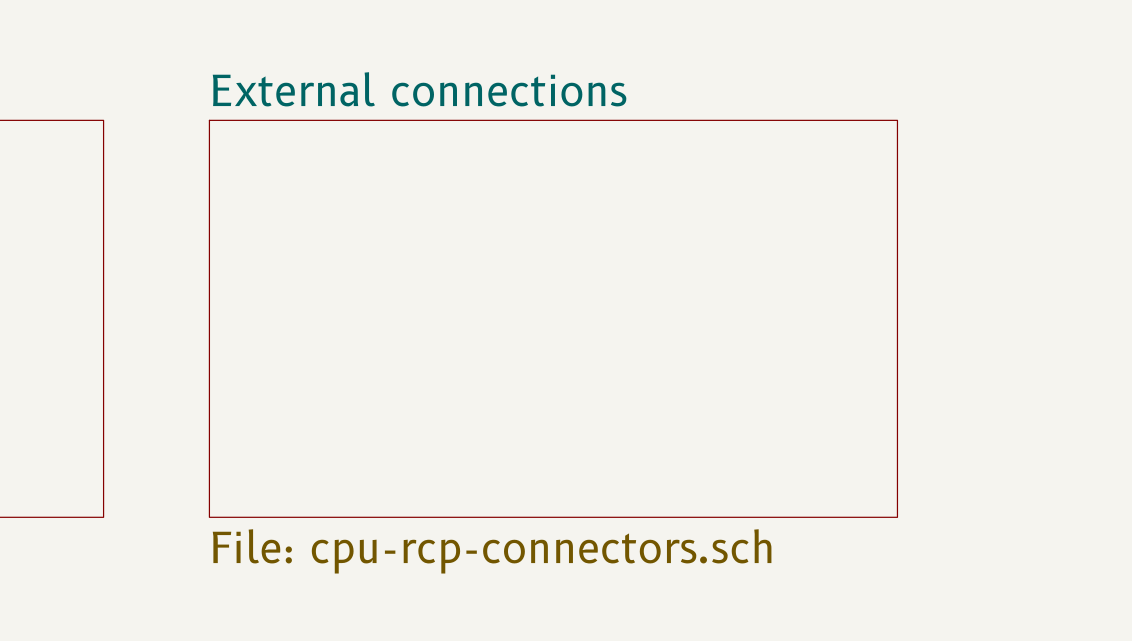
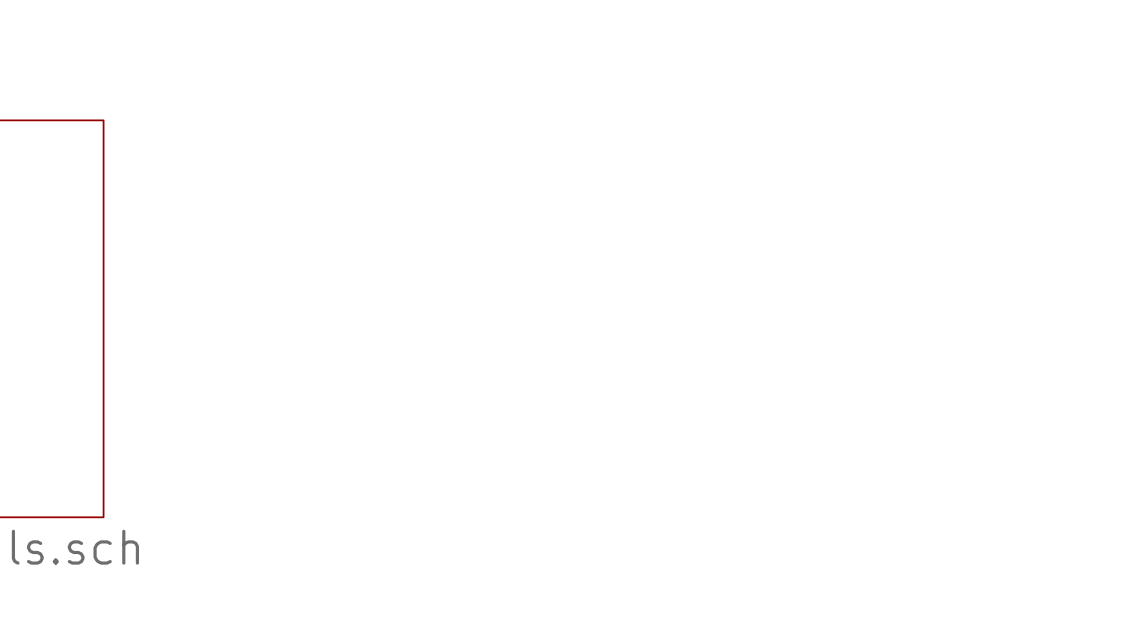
sheet External connections: File: cpu-rcp-connectors.sch (553, 318) -> none

